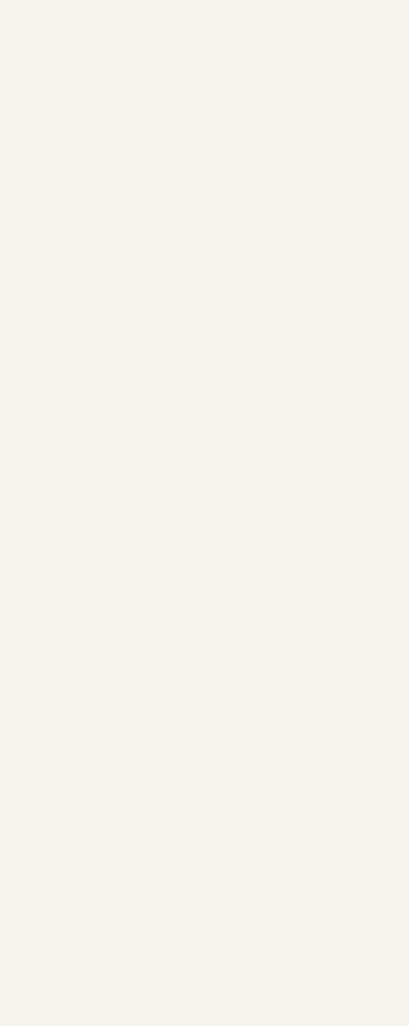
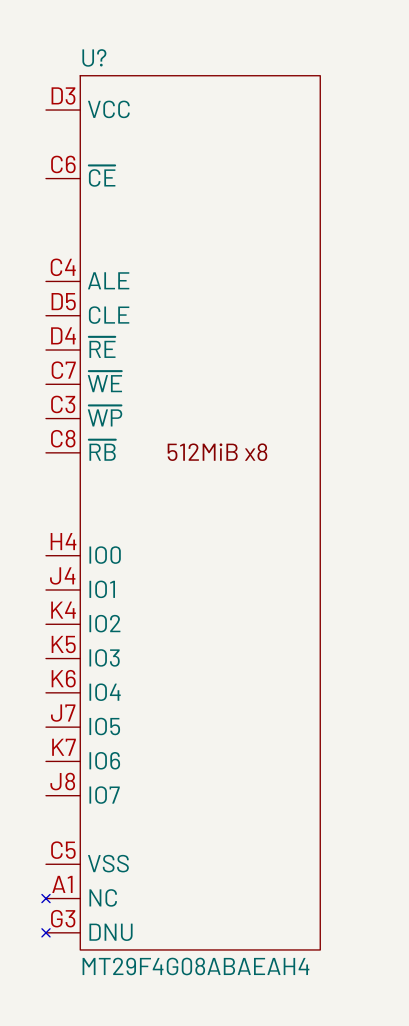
U?: none -> MT29F4G08ABAEAH4 (181, 512)

